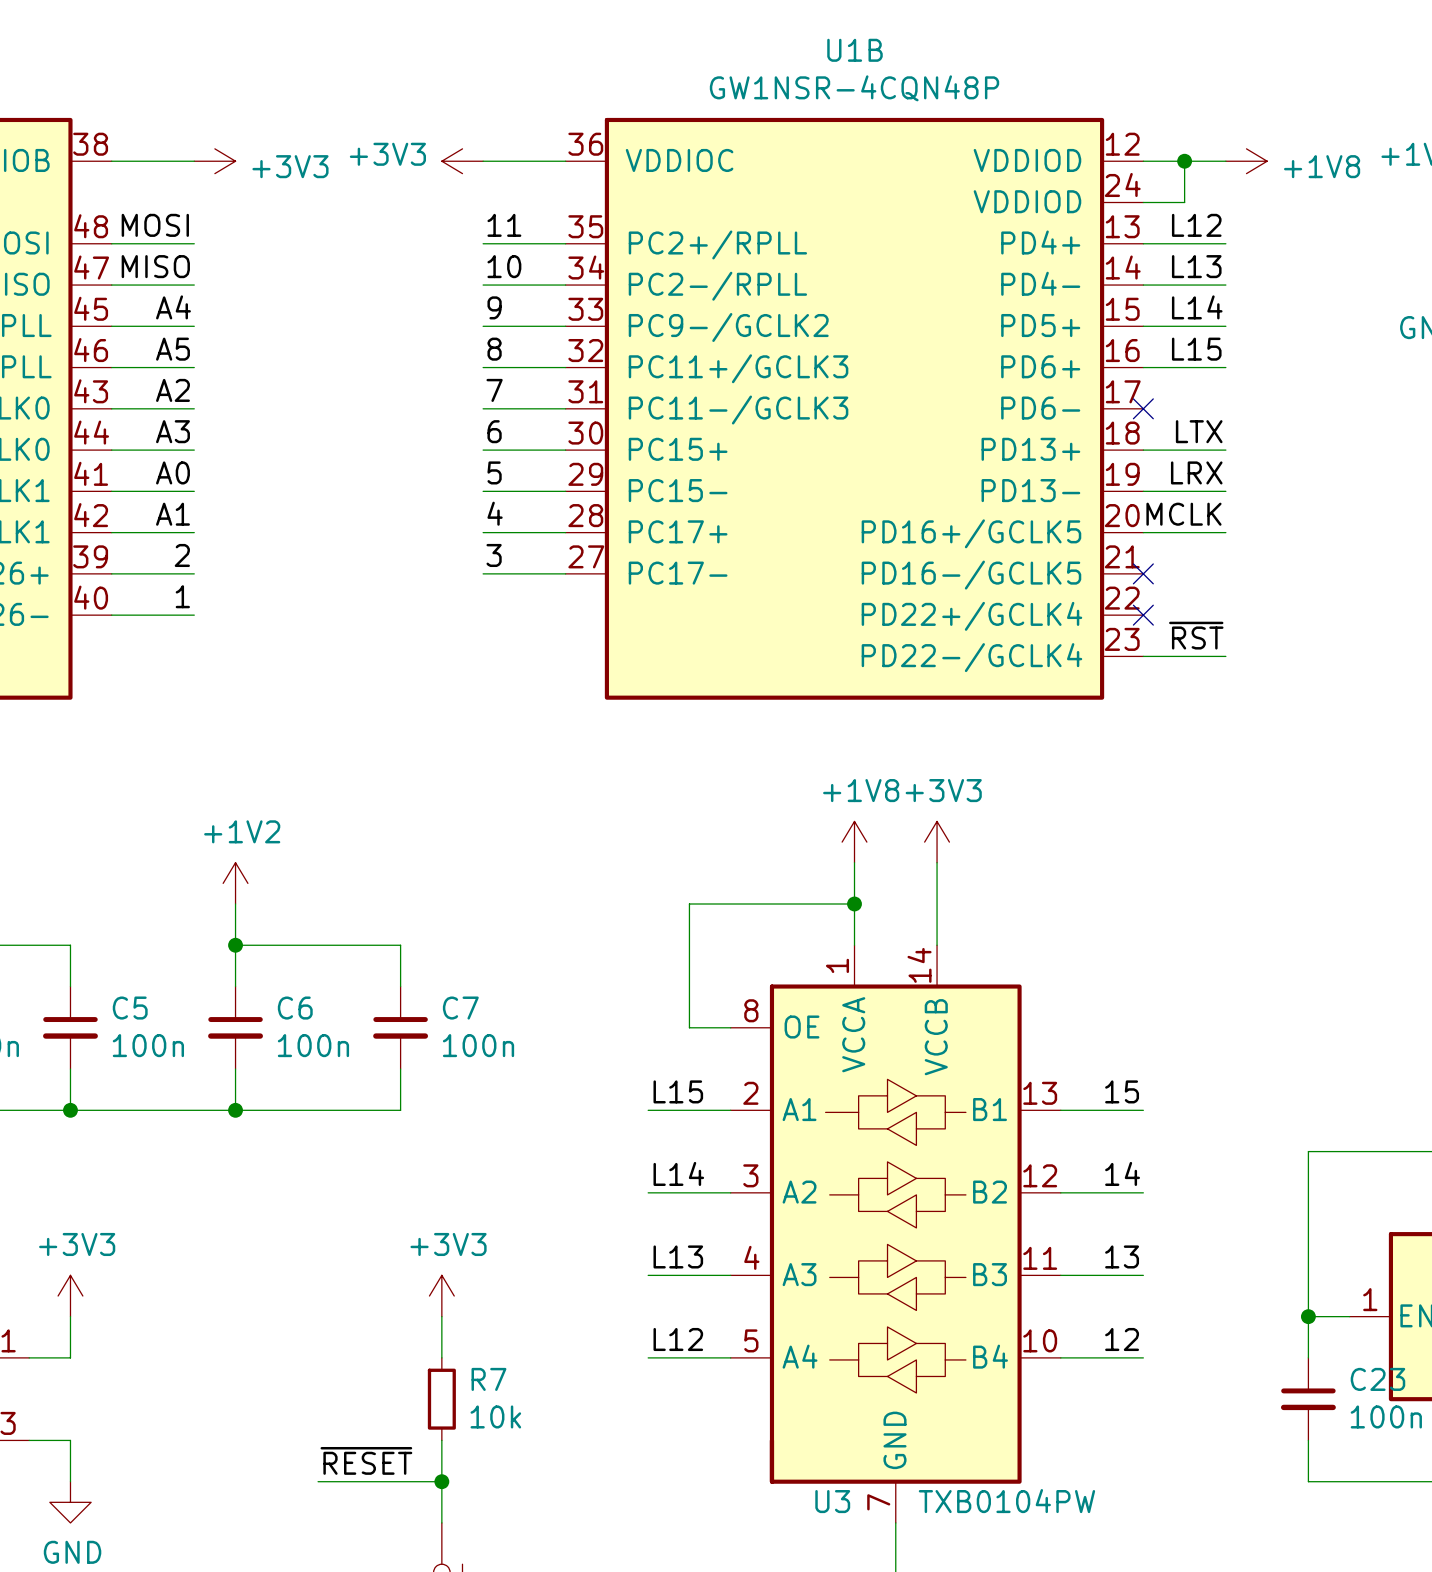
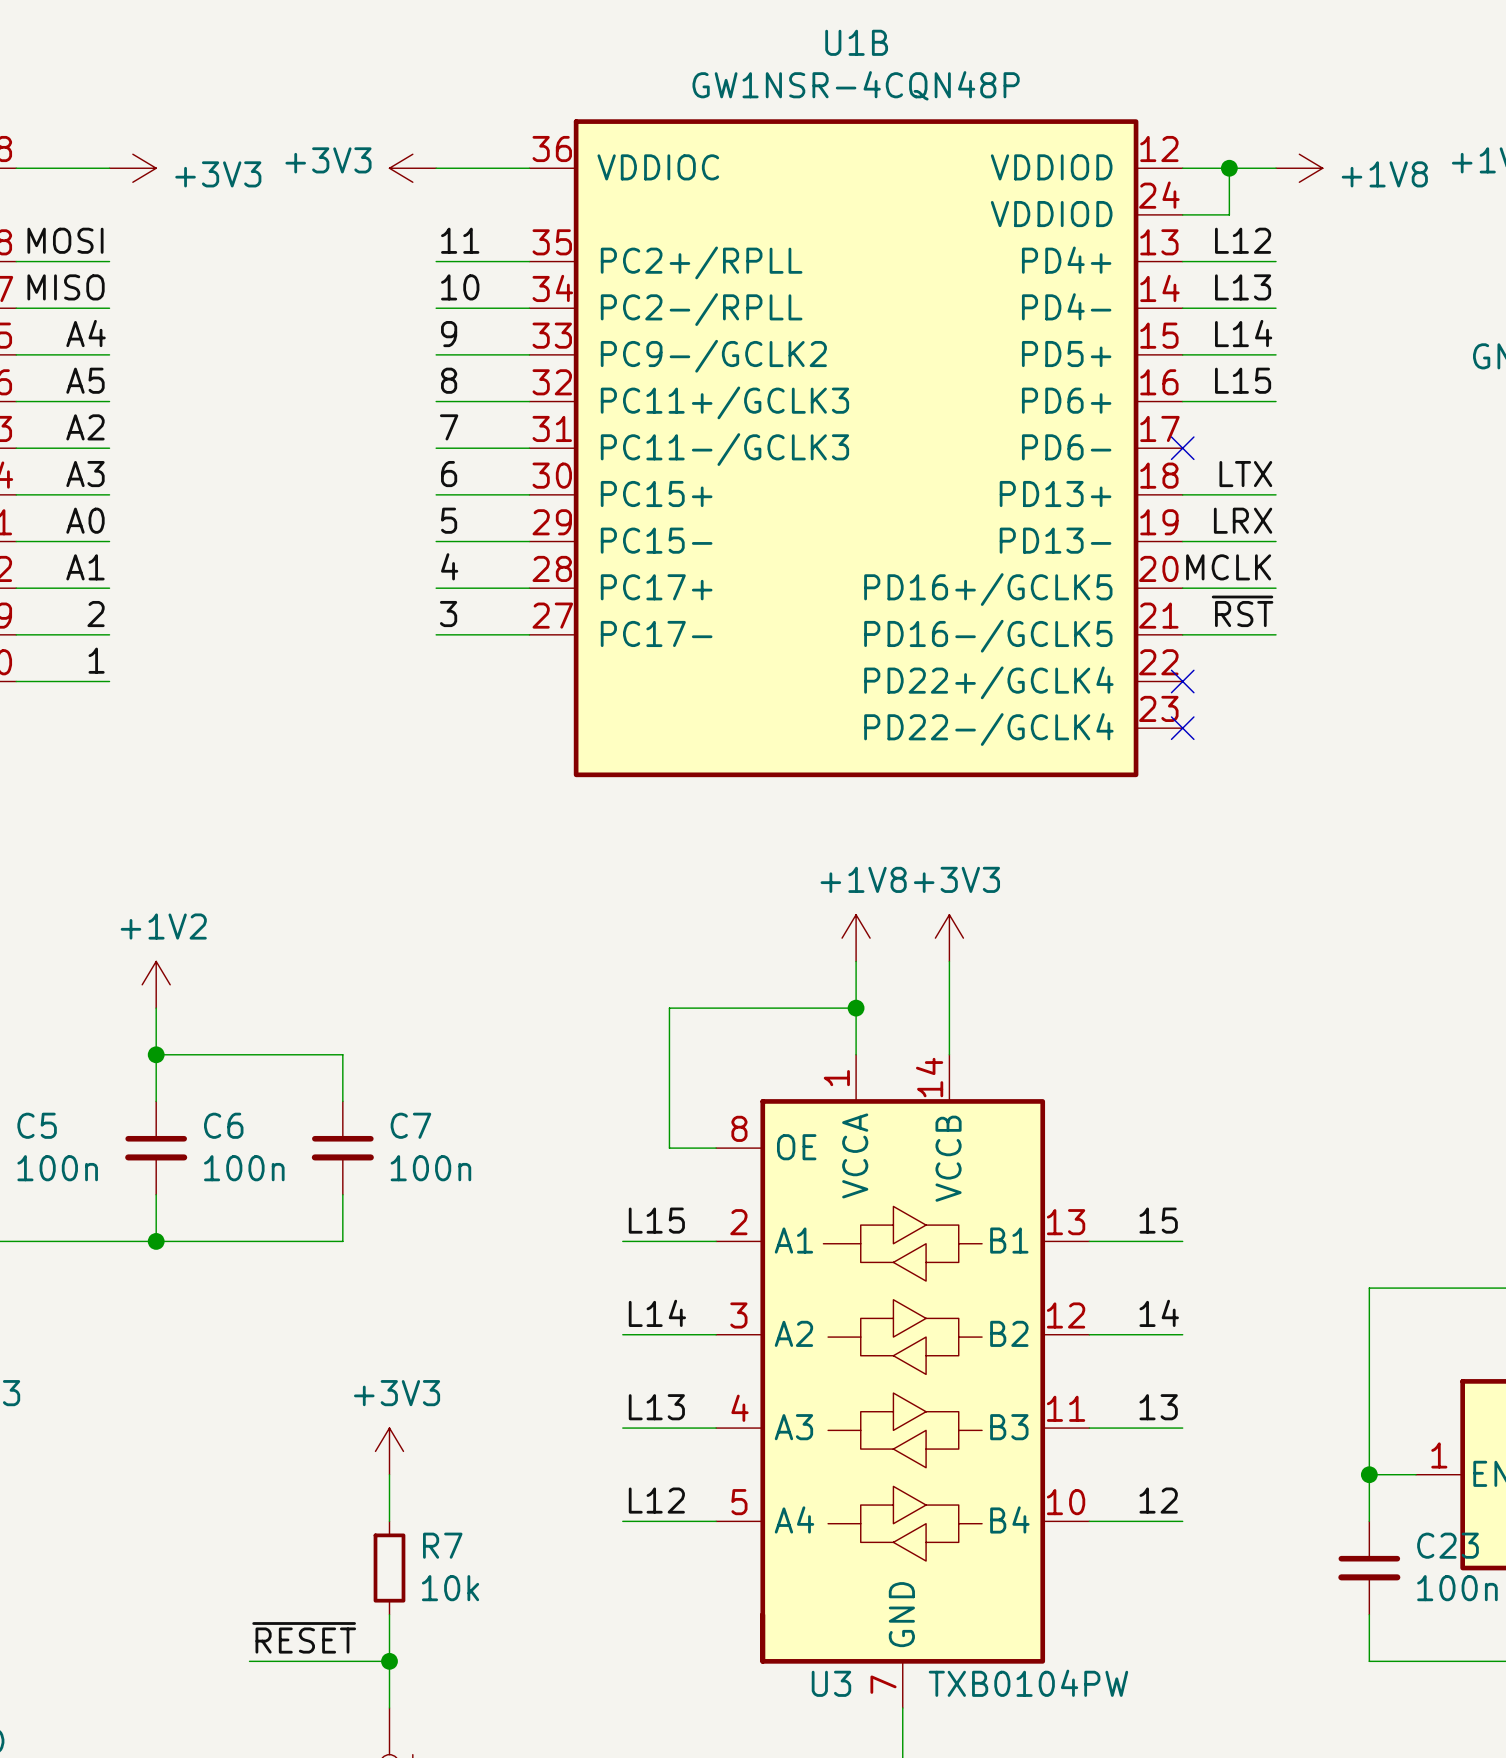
no-connect mark position: (1143, 573) -> (1182, 728)
label position: ~{RST} (1196, 635) -> ~{RST} (1242, 611)
wire: (1143, 656) (1225, 656) -> (1182, 634) (1276, 634)

